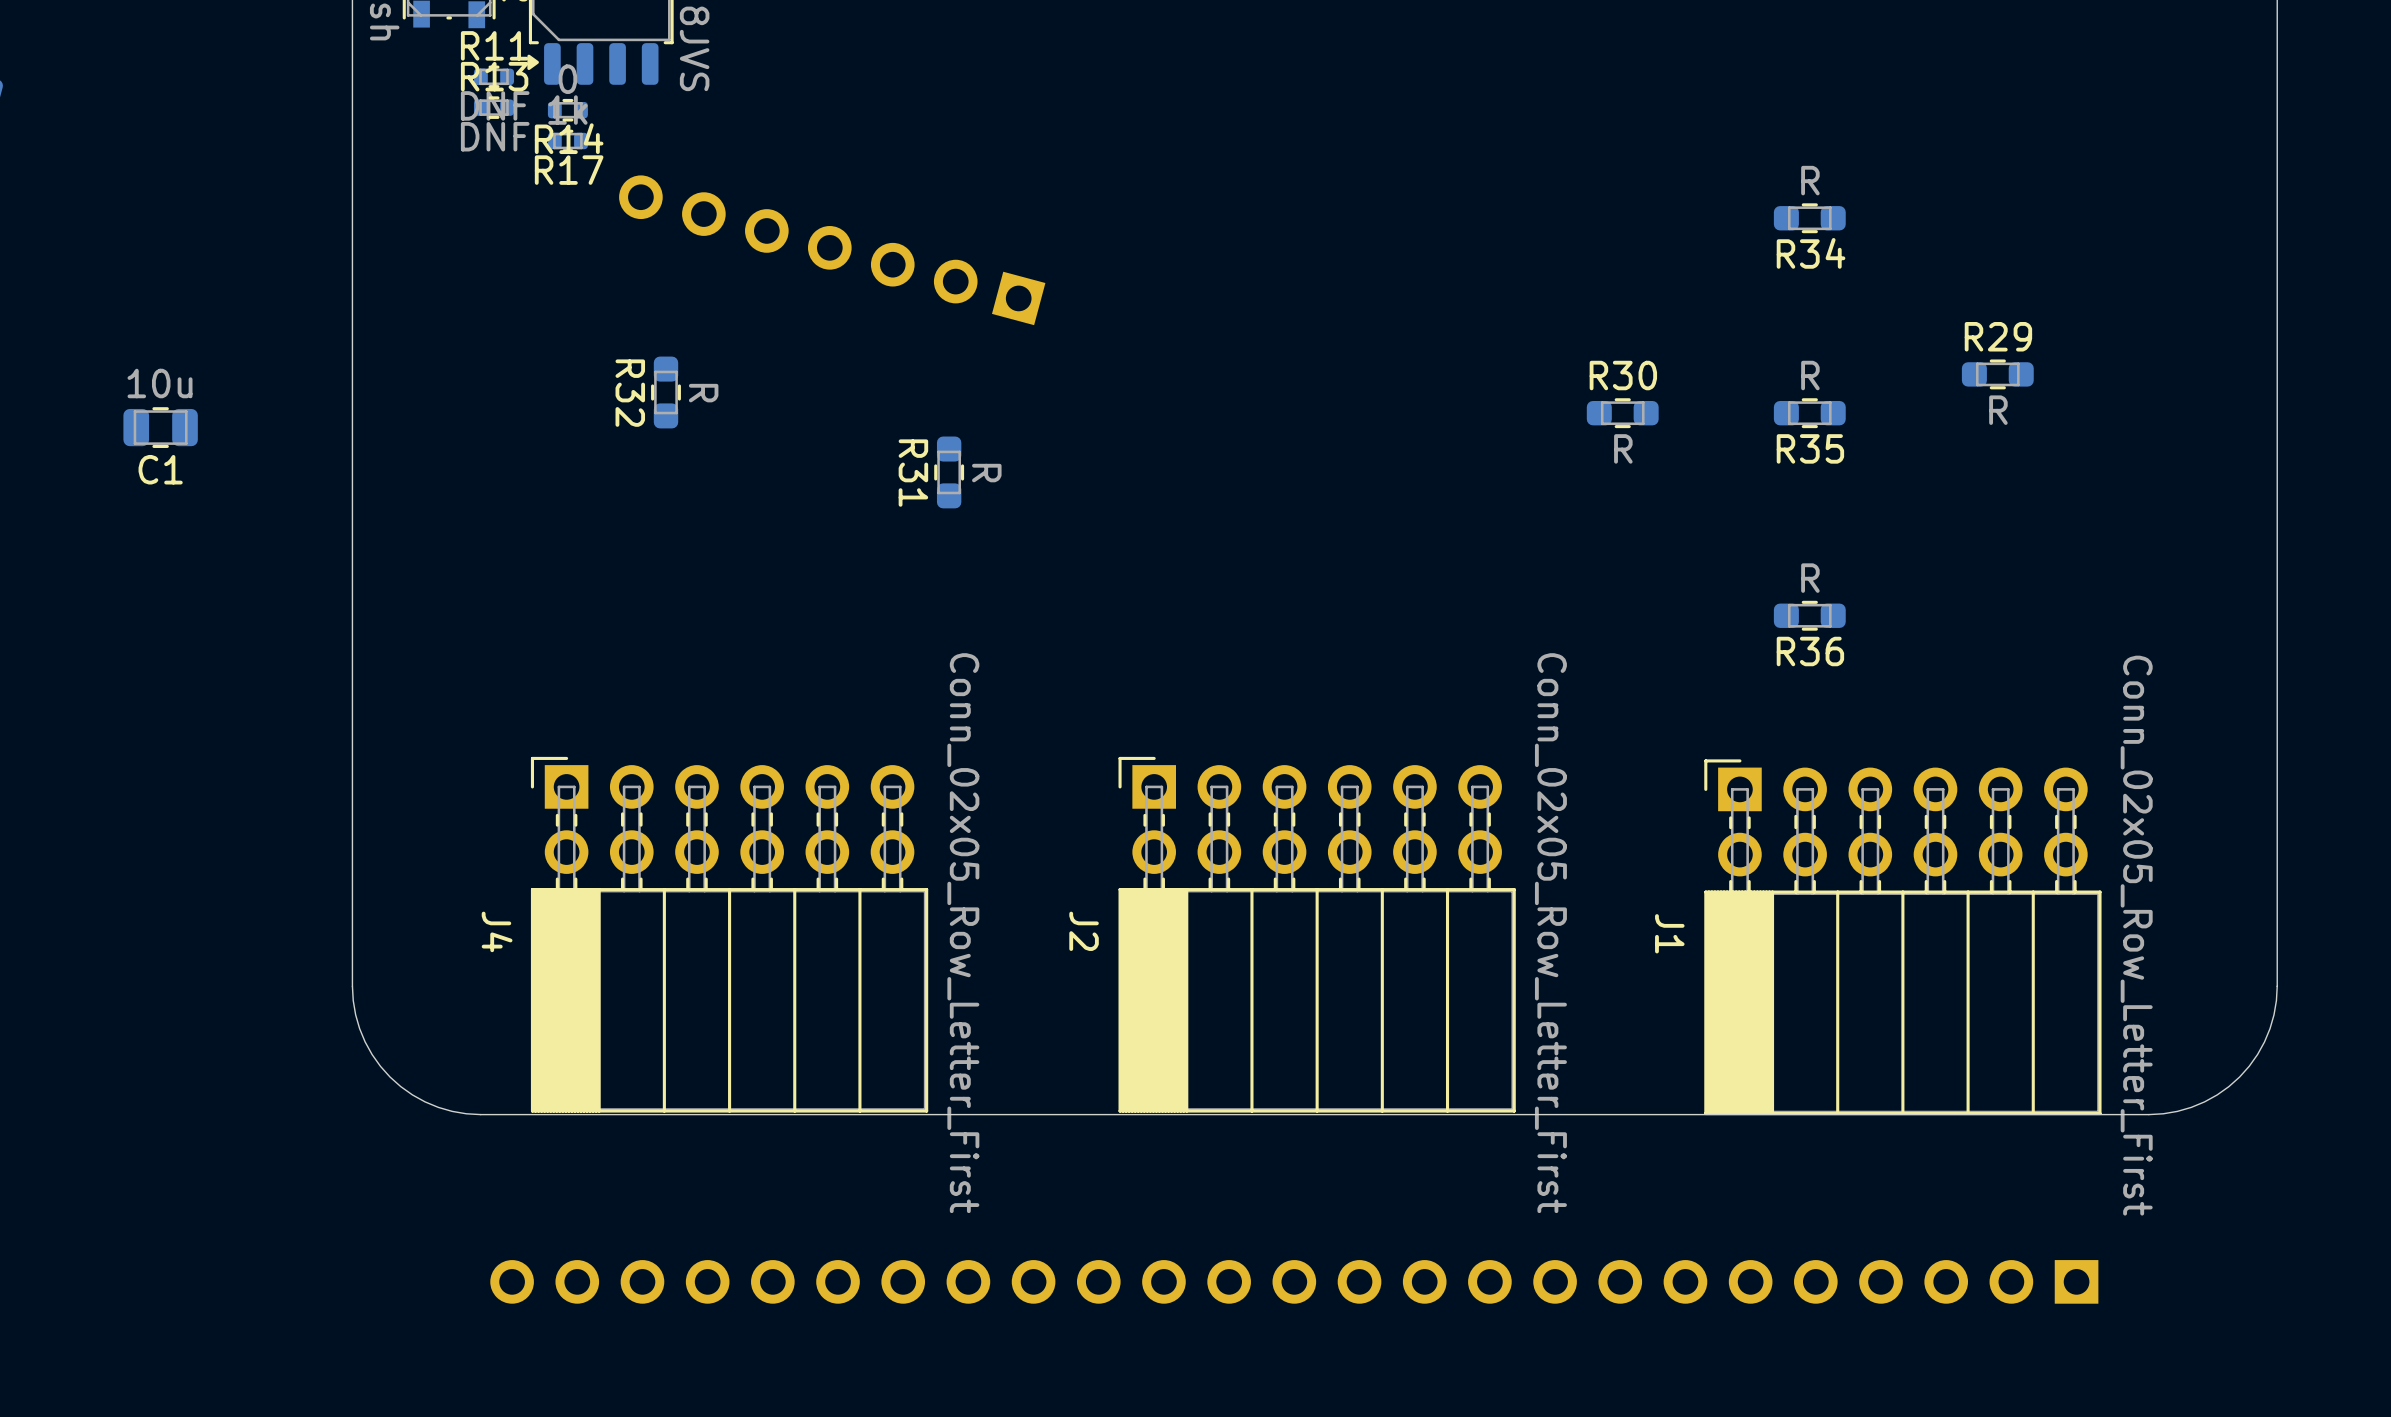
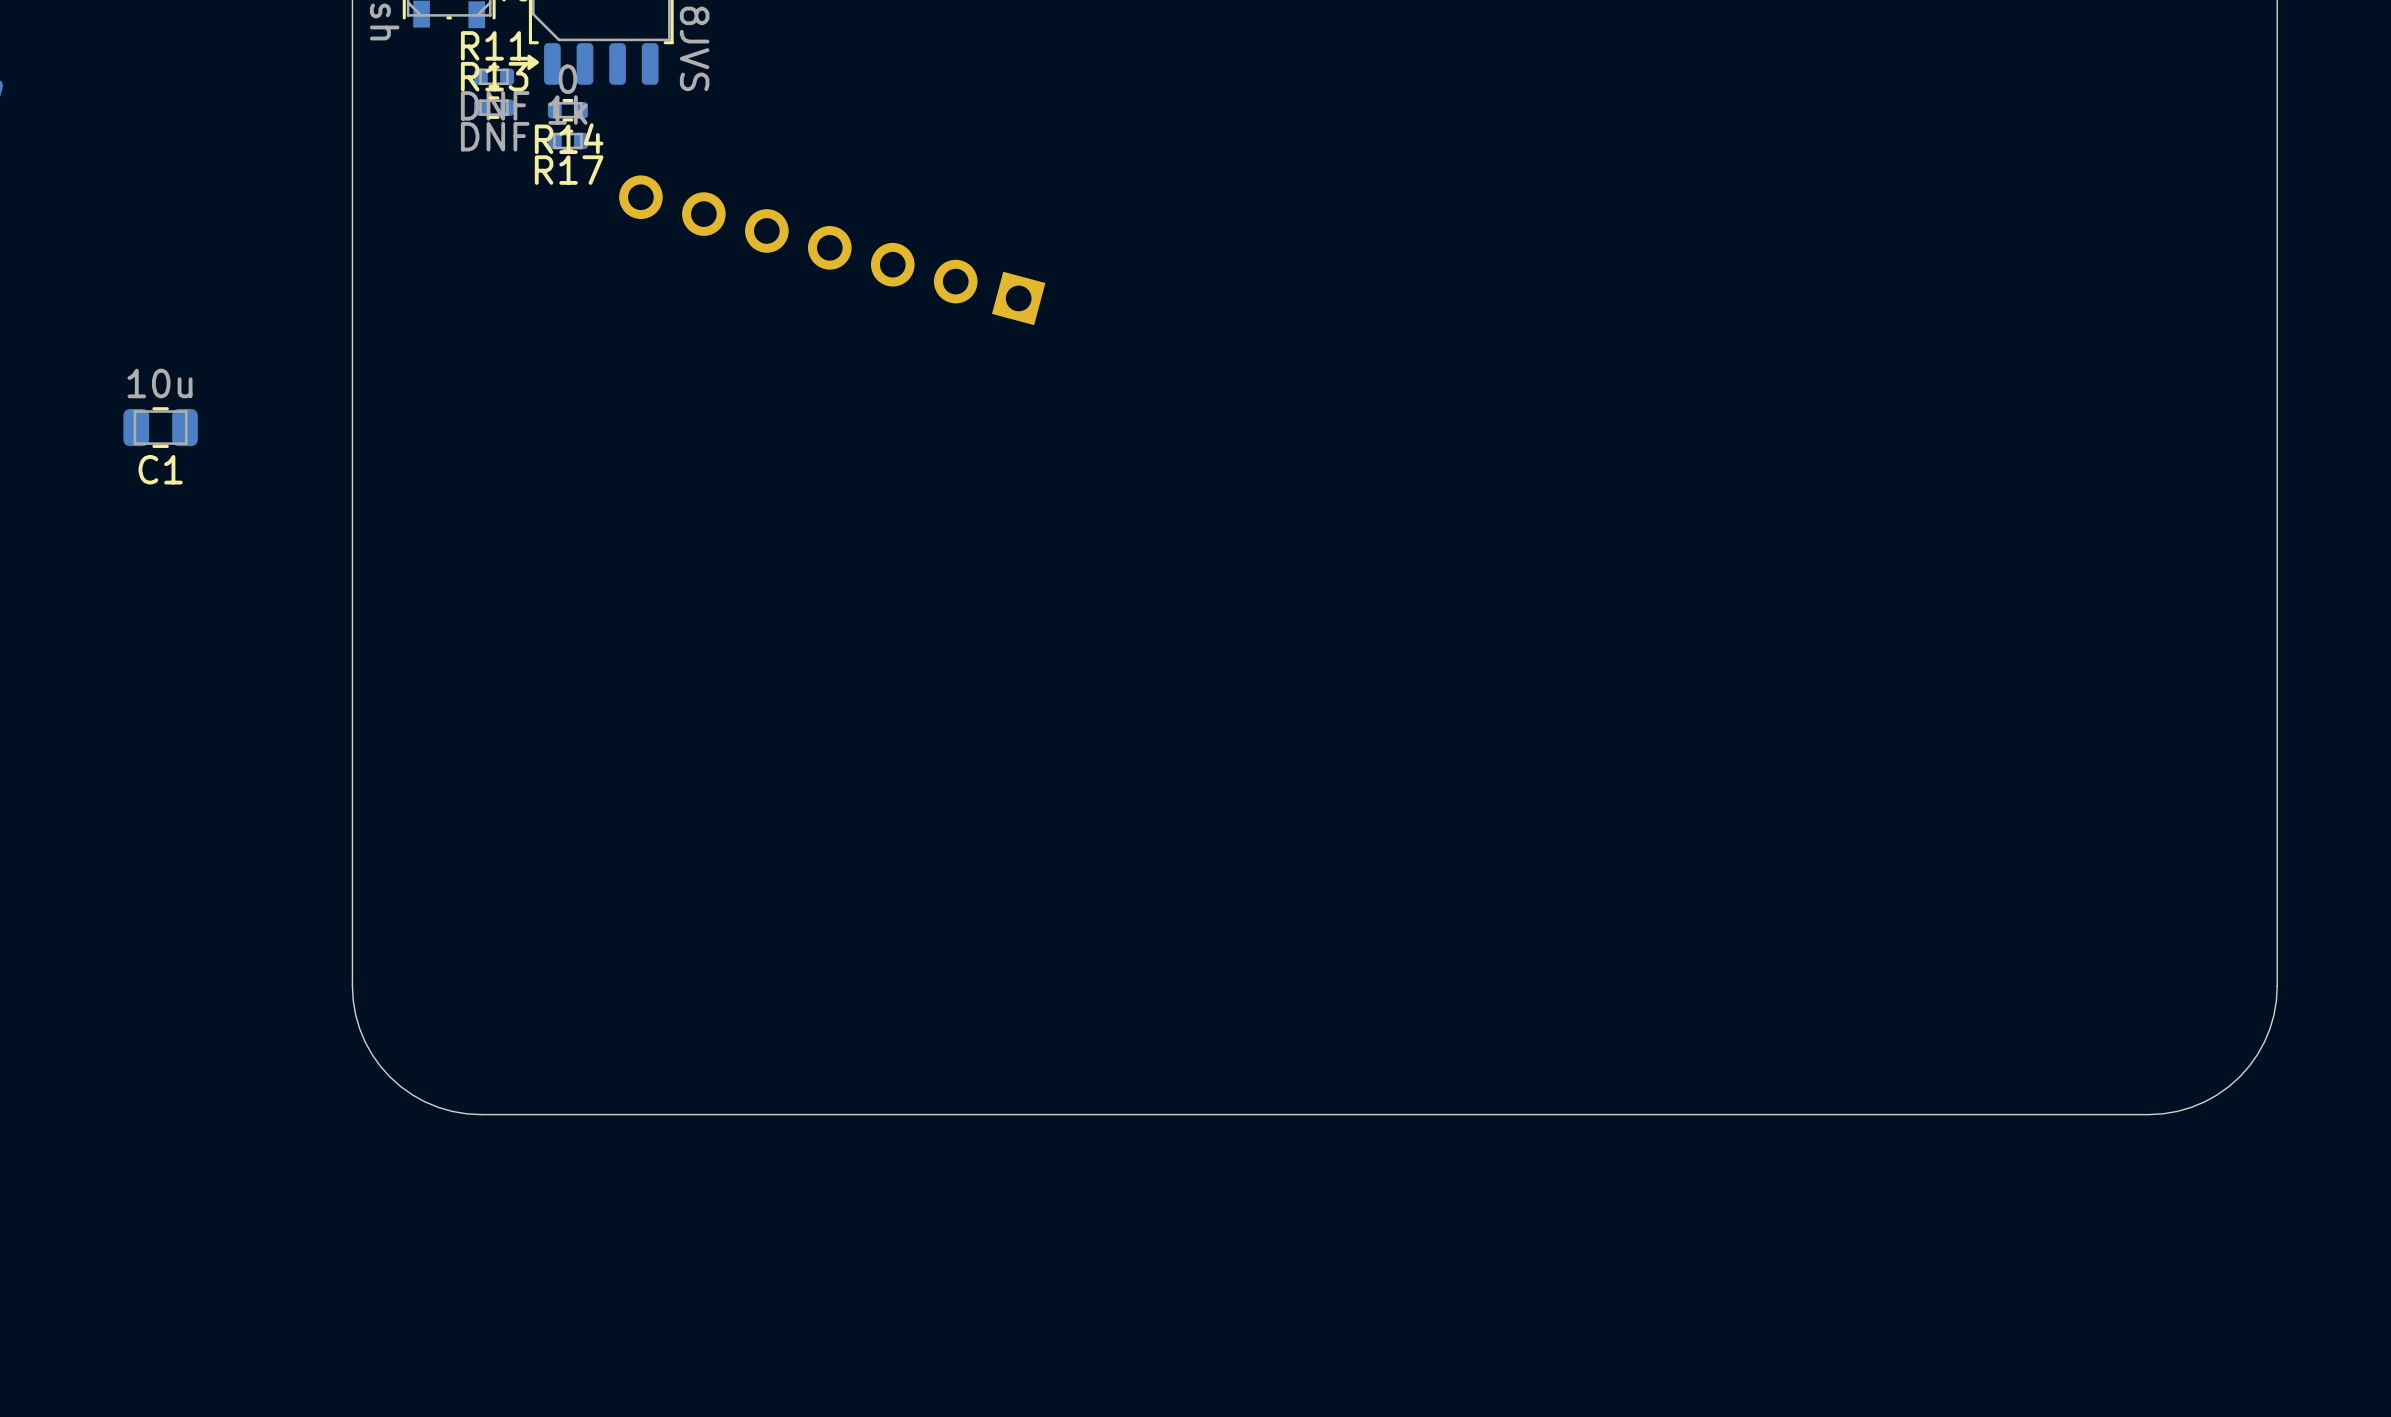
R34: R (1809, 218) -> none
R29: R (1997, 374) -> none
R32: R (666, 392) -> none
R30: R (1622, 413) -> none
R35: R (1809, 413) -> none
R31: R (949, 472) -> none
R36: R (1809, 615) -> none
J4: Conn_02x05_Row_Letter_First (729, 934) -> none
J2: Conn_02x05_Row_Letter_First (1317, 934) -> none
J1: Conn_02x05_Row_Letter_First (1902, 937) -> none
part: (1294, 1281) -> none

